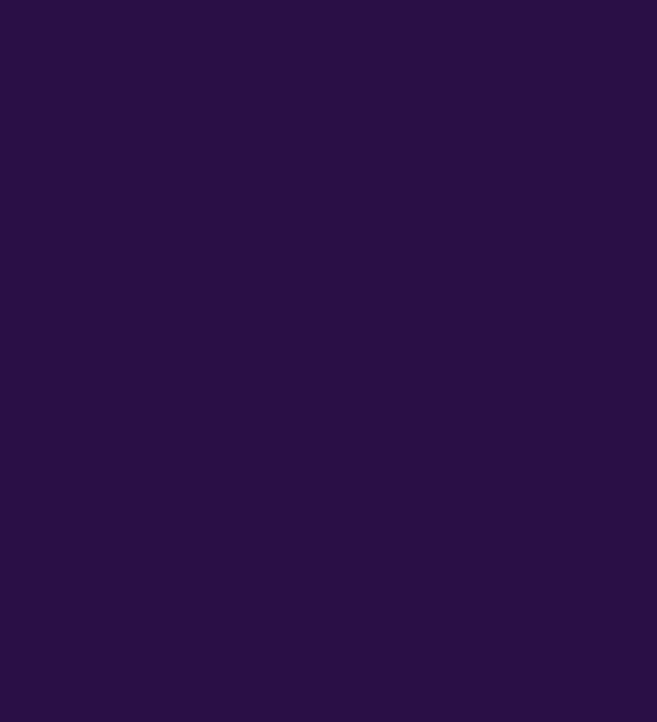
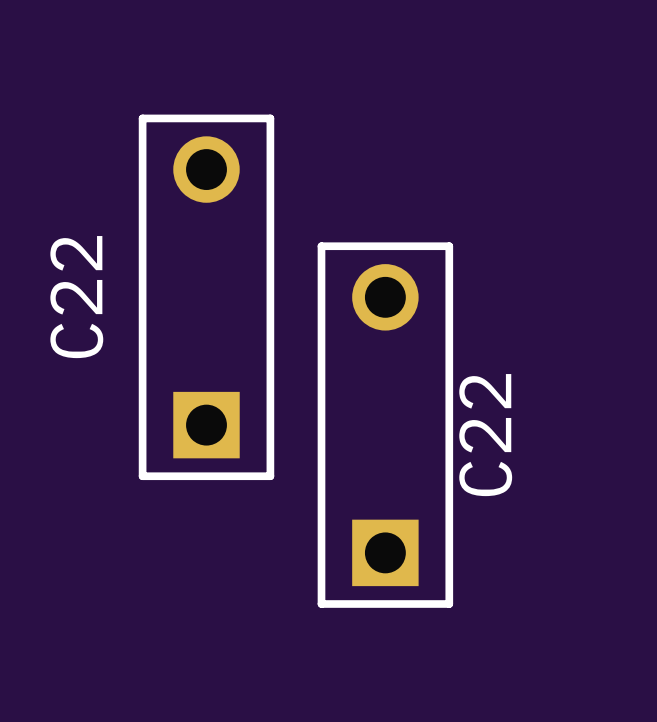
C22: none -> (206, 297)
C22: none -> (385, 425)

